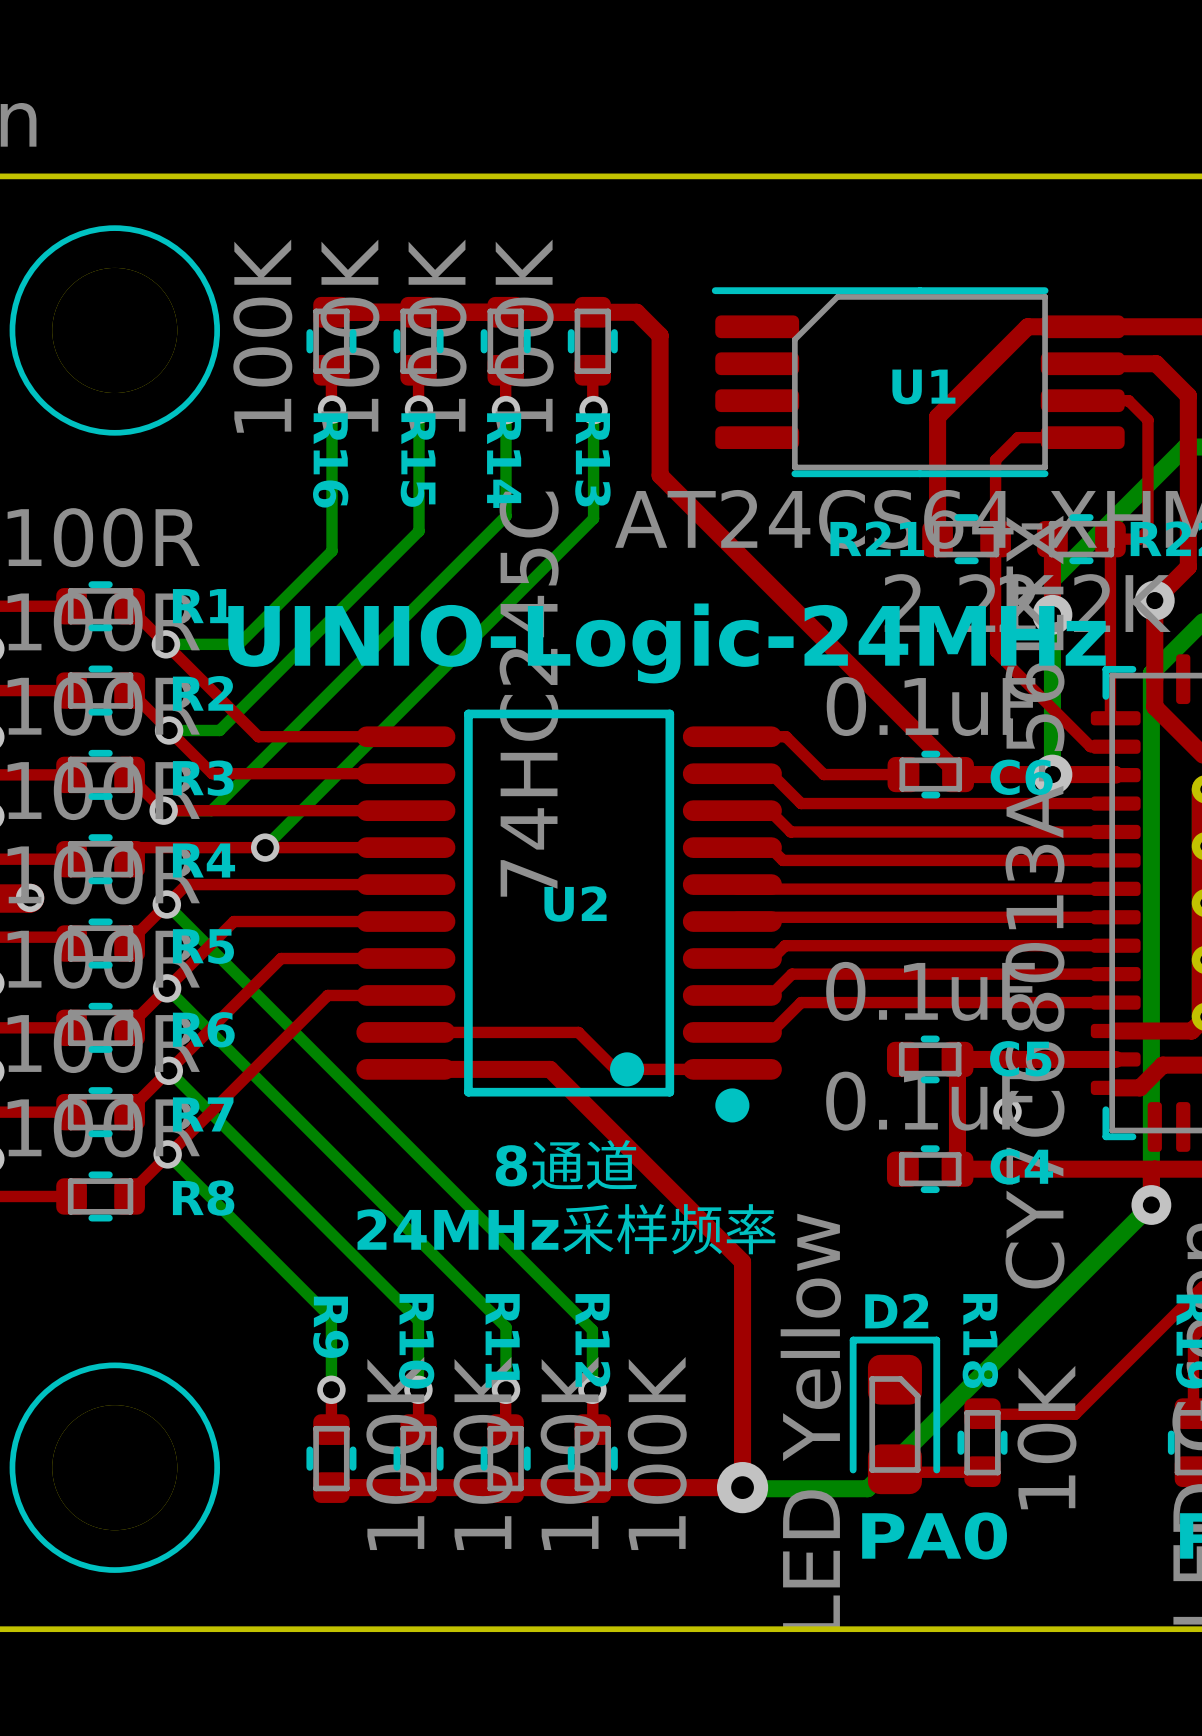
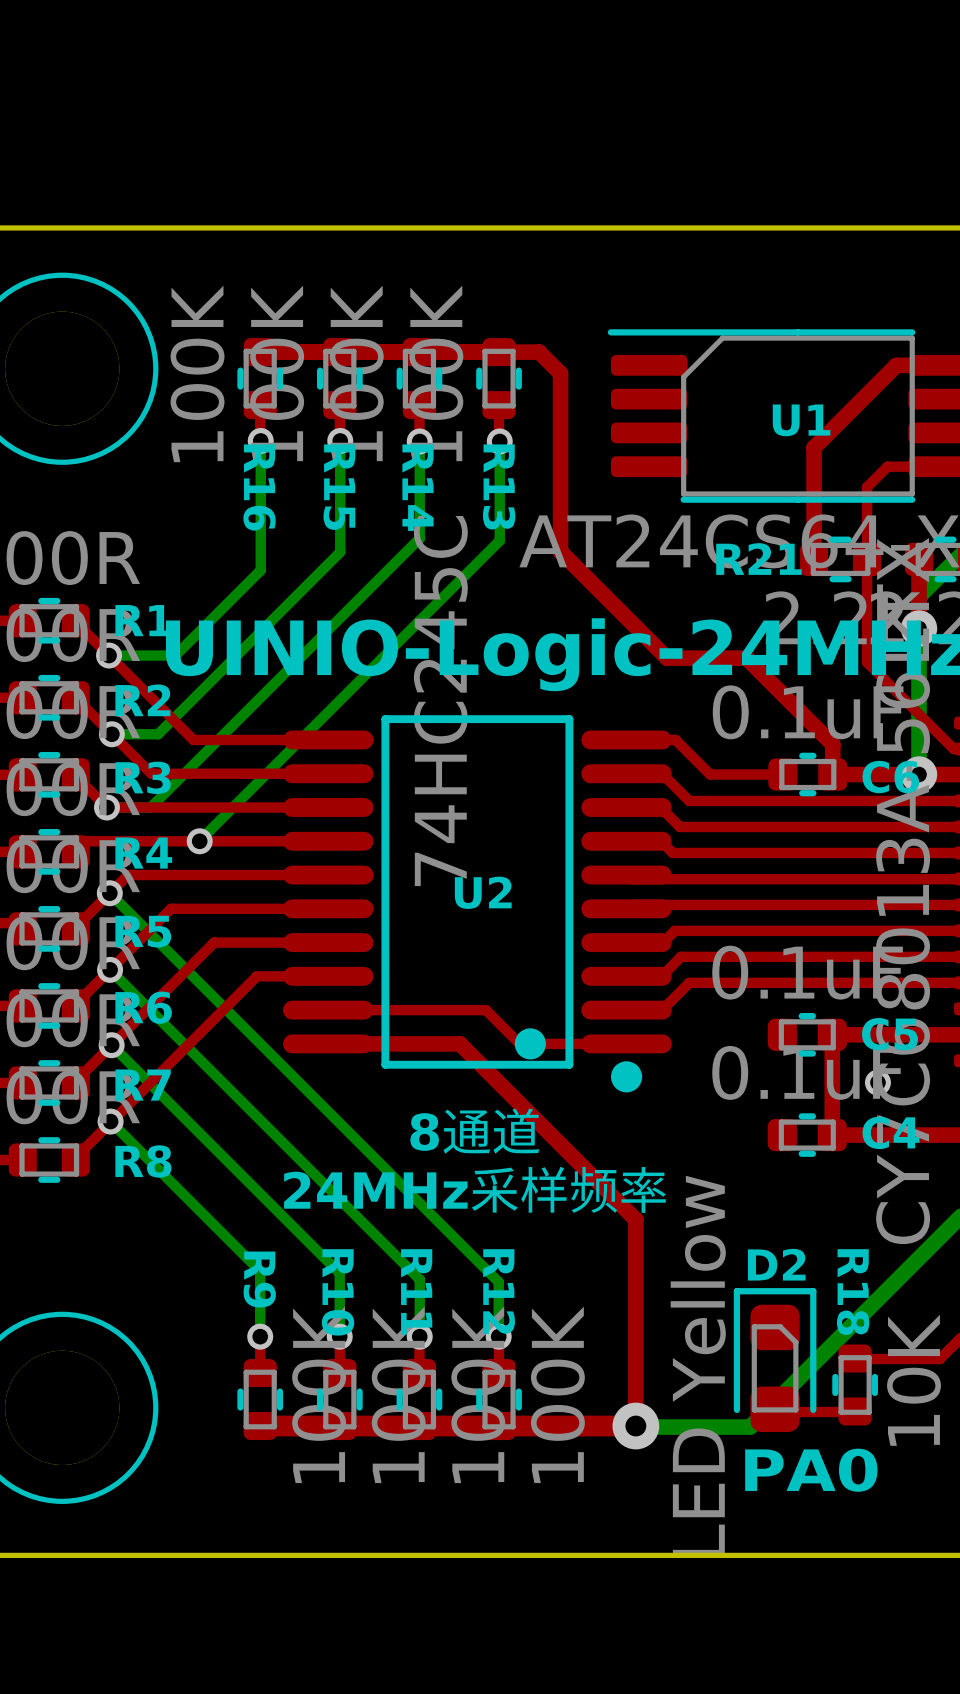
top track: (660, 475) (958, 773) -> (560, 501) (560, 551) (667, 658) (746, 658) (832, 744) (832, 774)
top track width: thin (331, 1487) (742, 1487) -> thick (260, 1426) (635, 1426)

